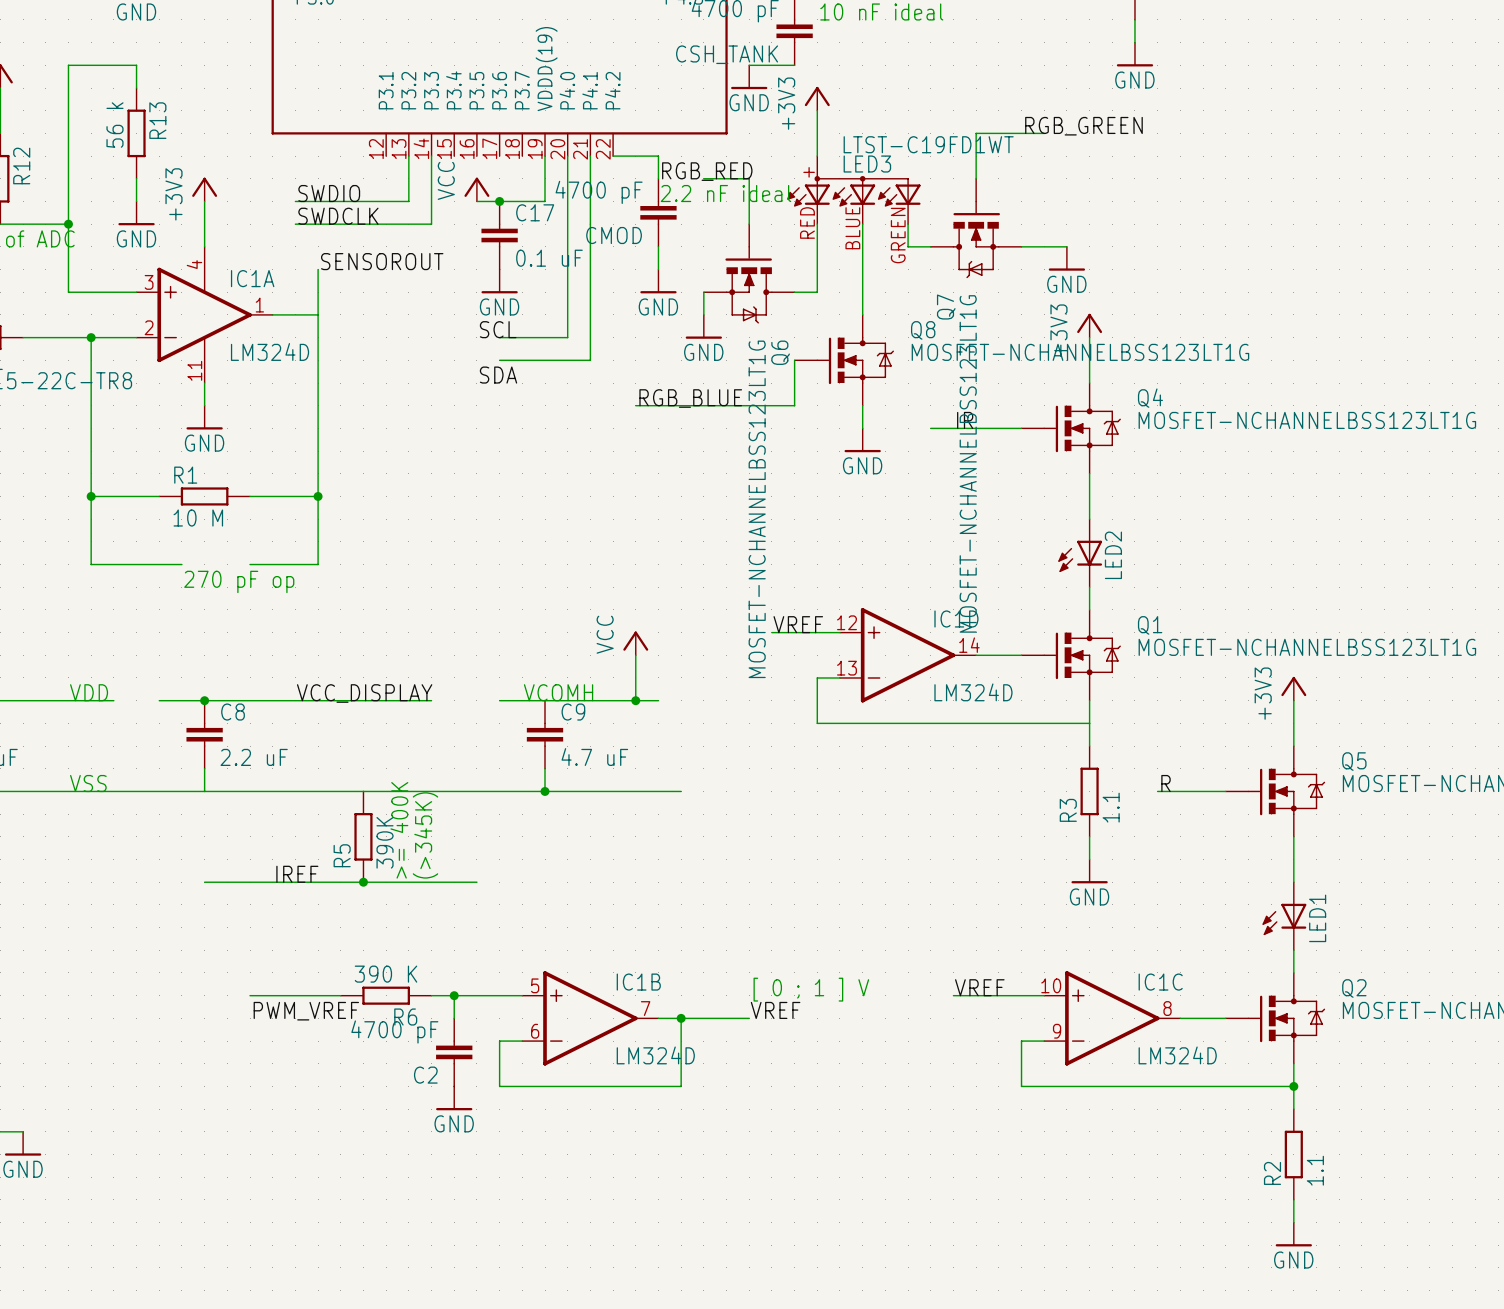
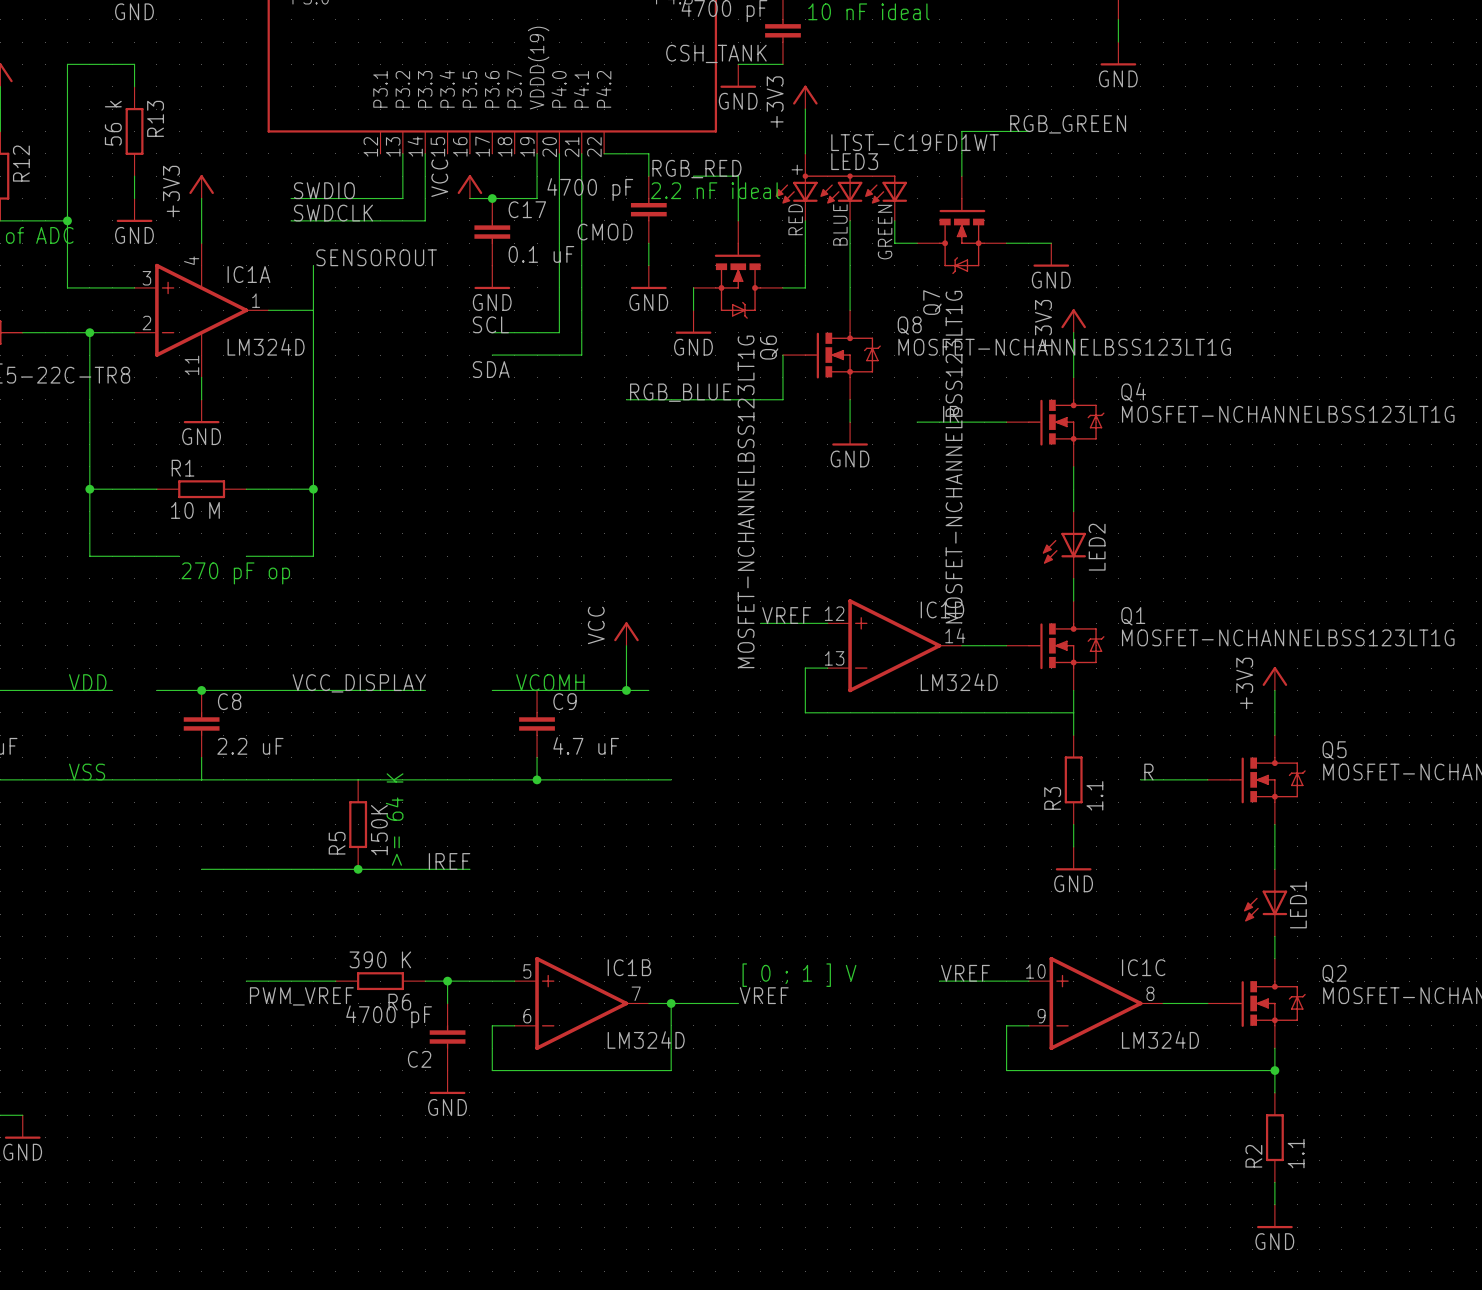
text: >= 400K (399, 830) -> >= 64 K (394, 819)
text: (>345K) (425, 835) -> none
R5 value: 390K (385, 842) -> 150K (379, 830)
label position: IREF (297, 874) -> IREF (449, 861)

